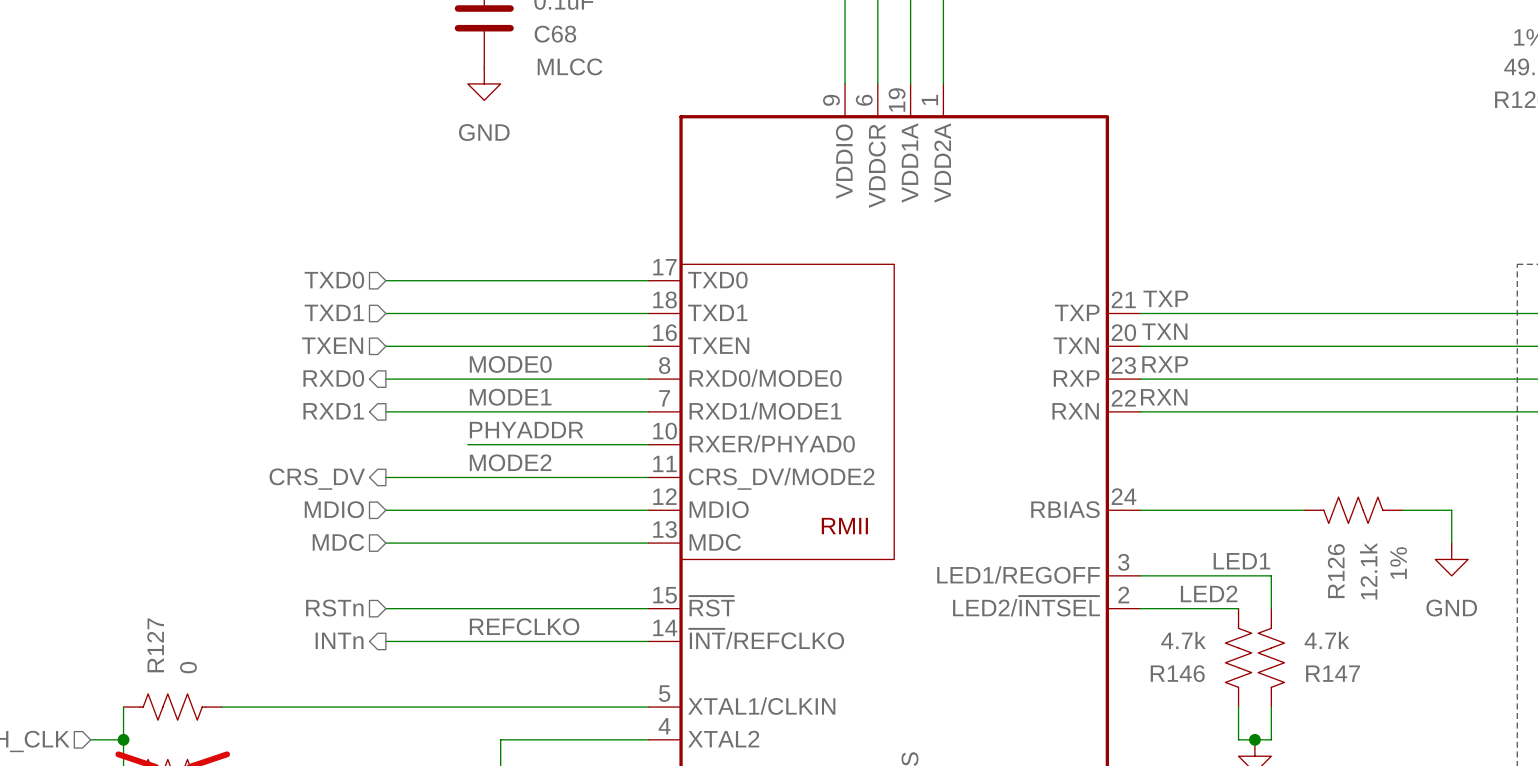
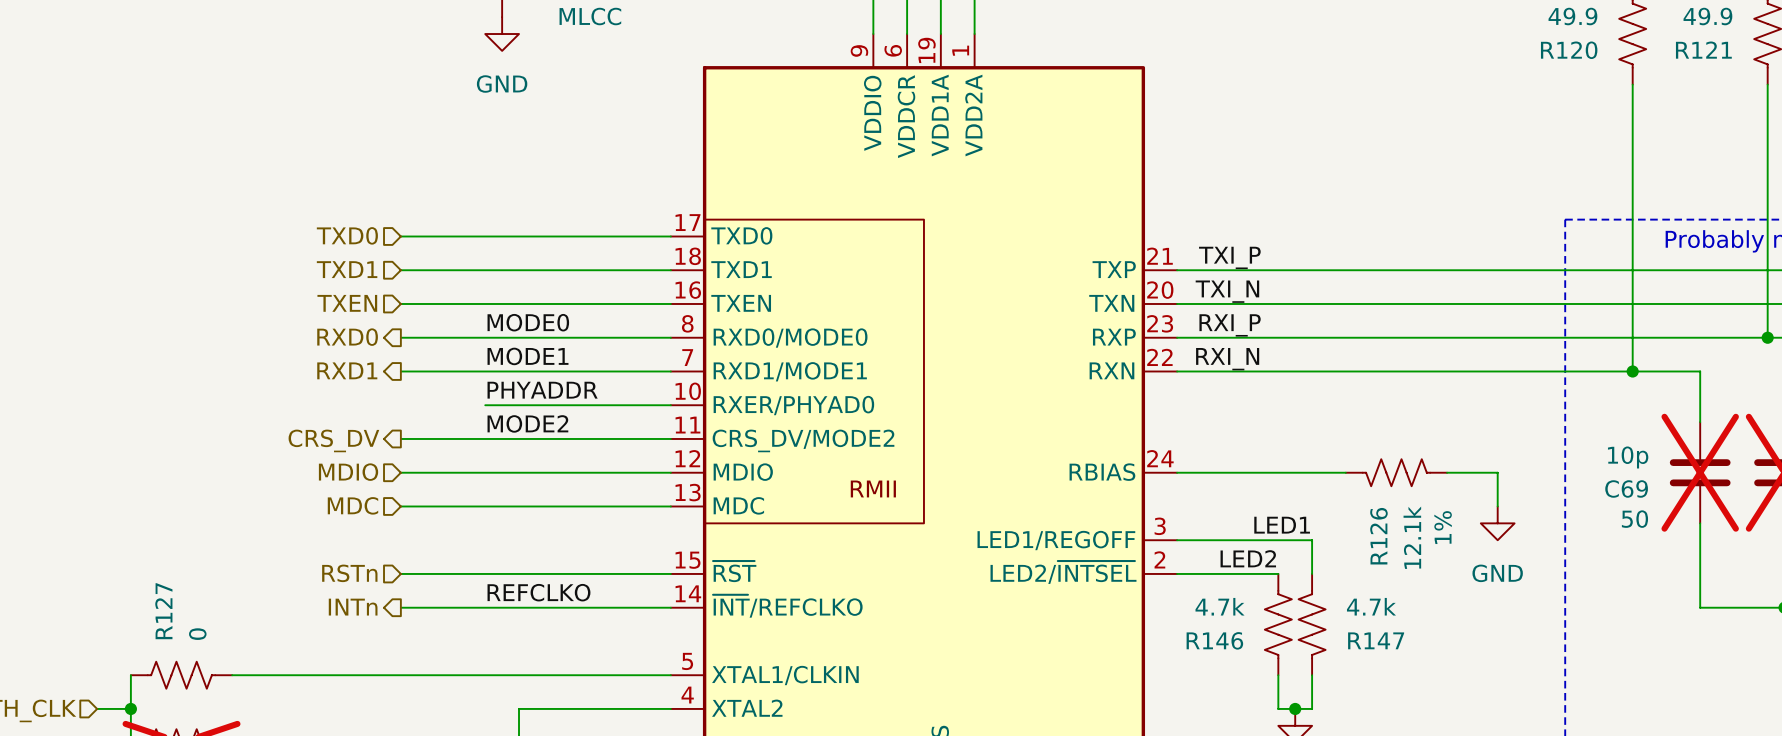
label: TXP (1165, 298) -> TXI_P (1229, 257)
label: TXN (1164, 331) -> TXI_N (1227, 291)
label: RXP (1165, 364) -> RXI_P (1230, 325)
label: RXN (1164, 397) -> RXI_N (1227, 359)

